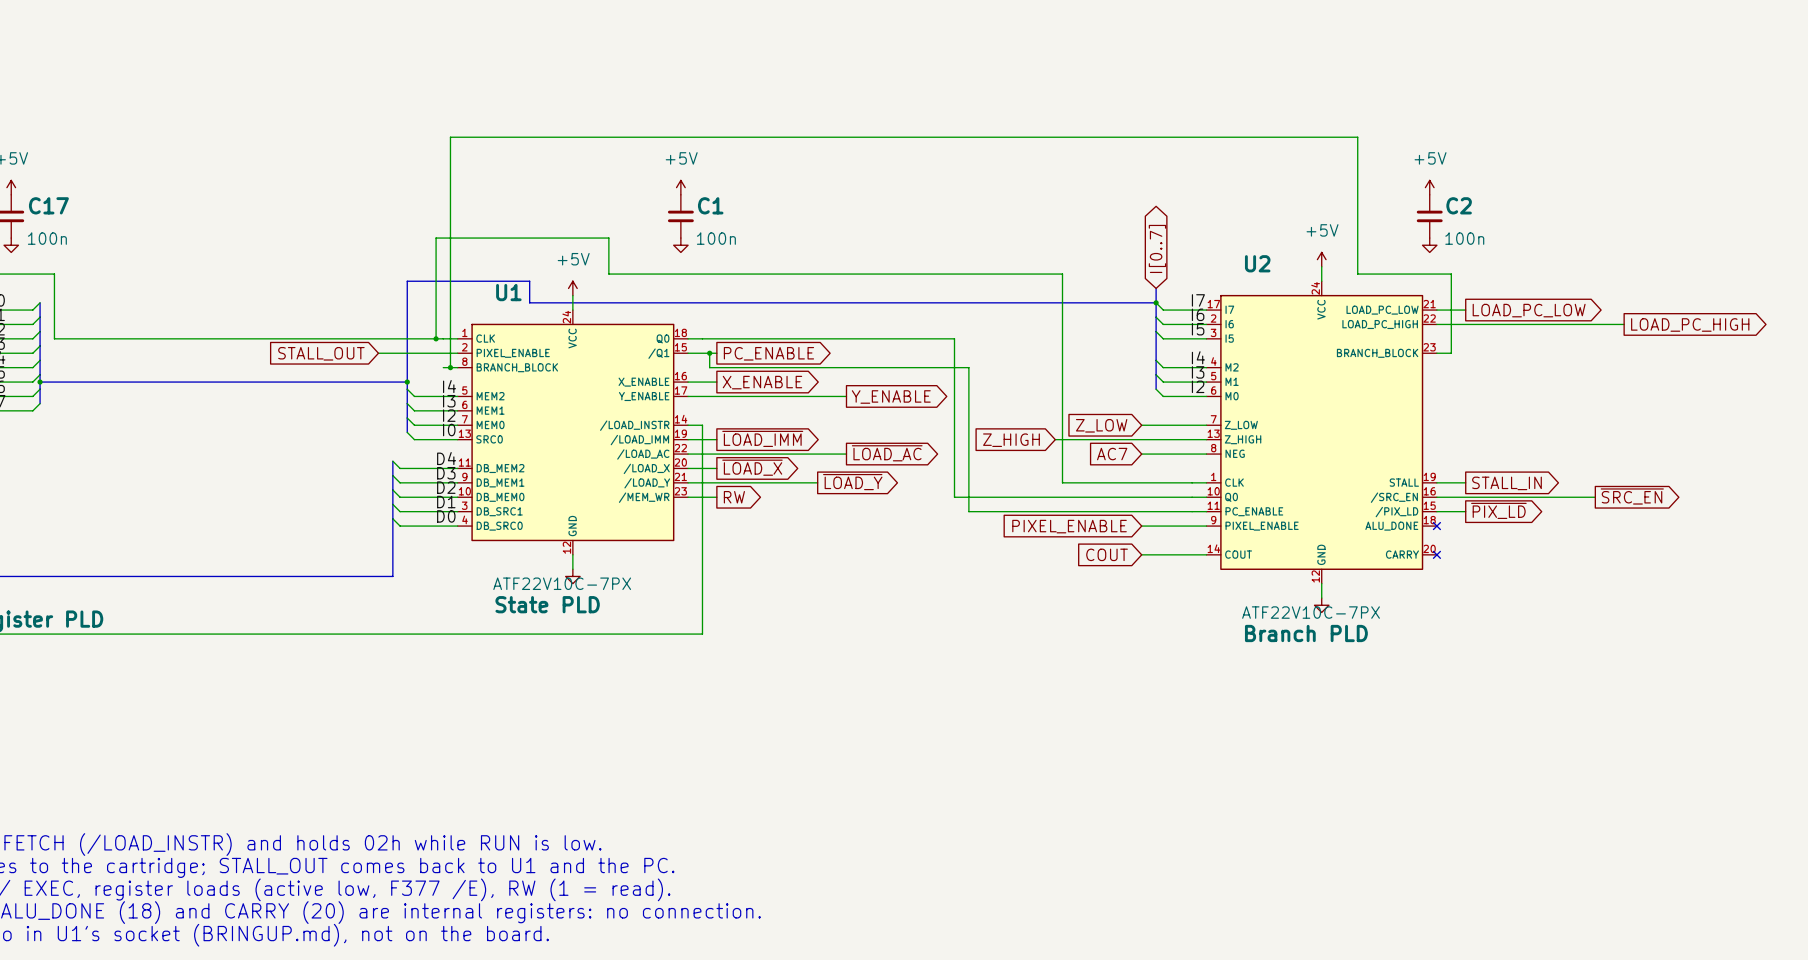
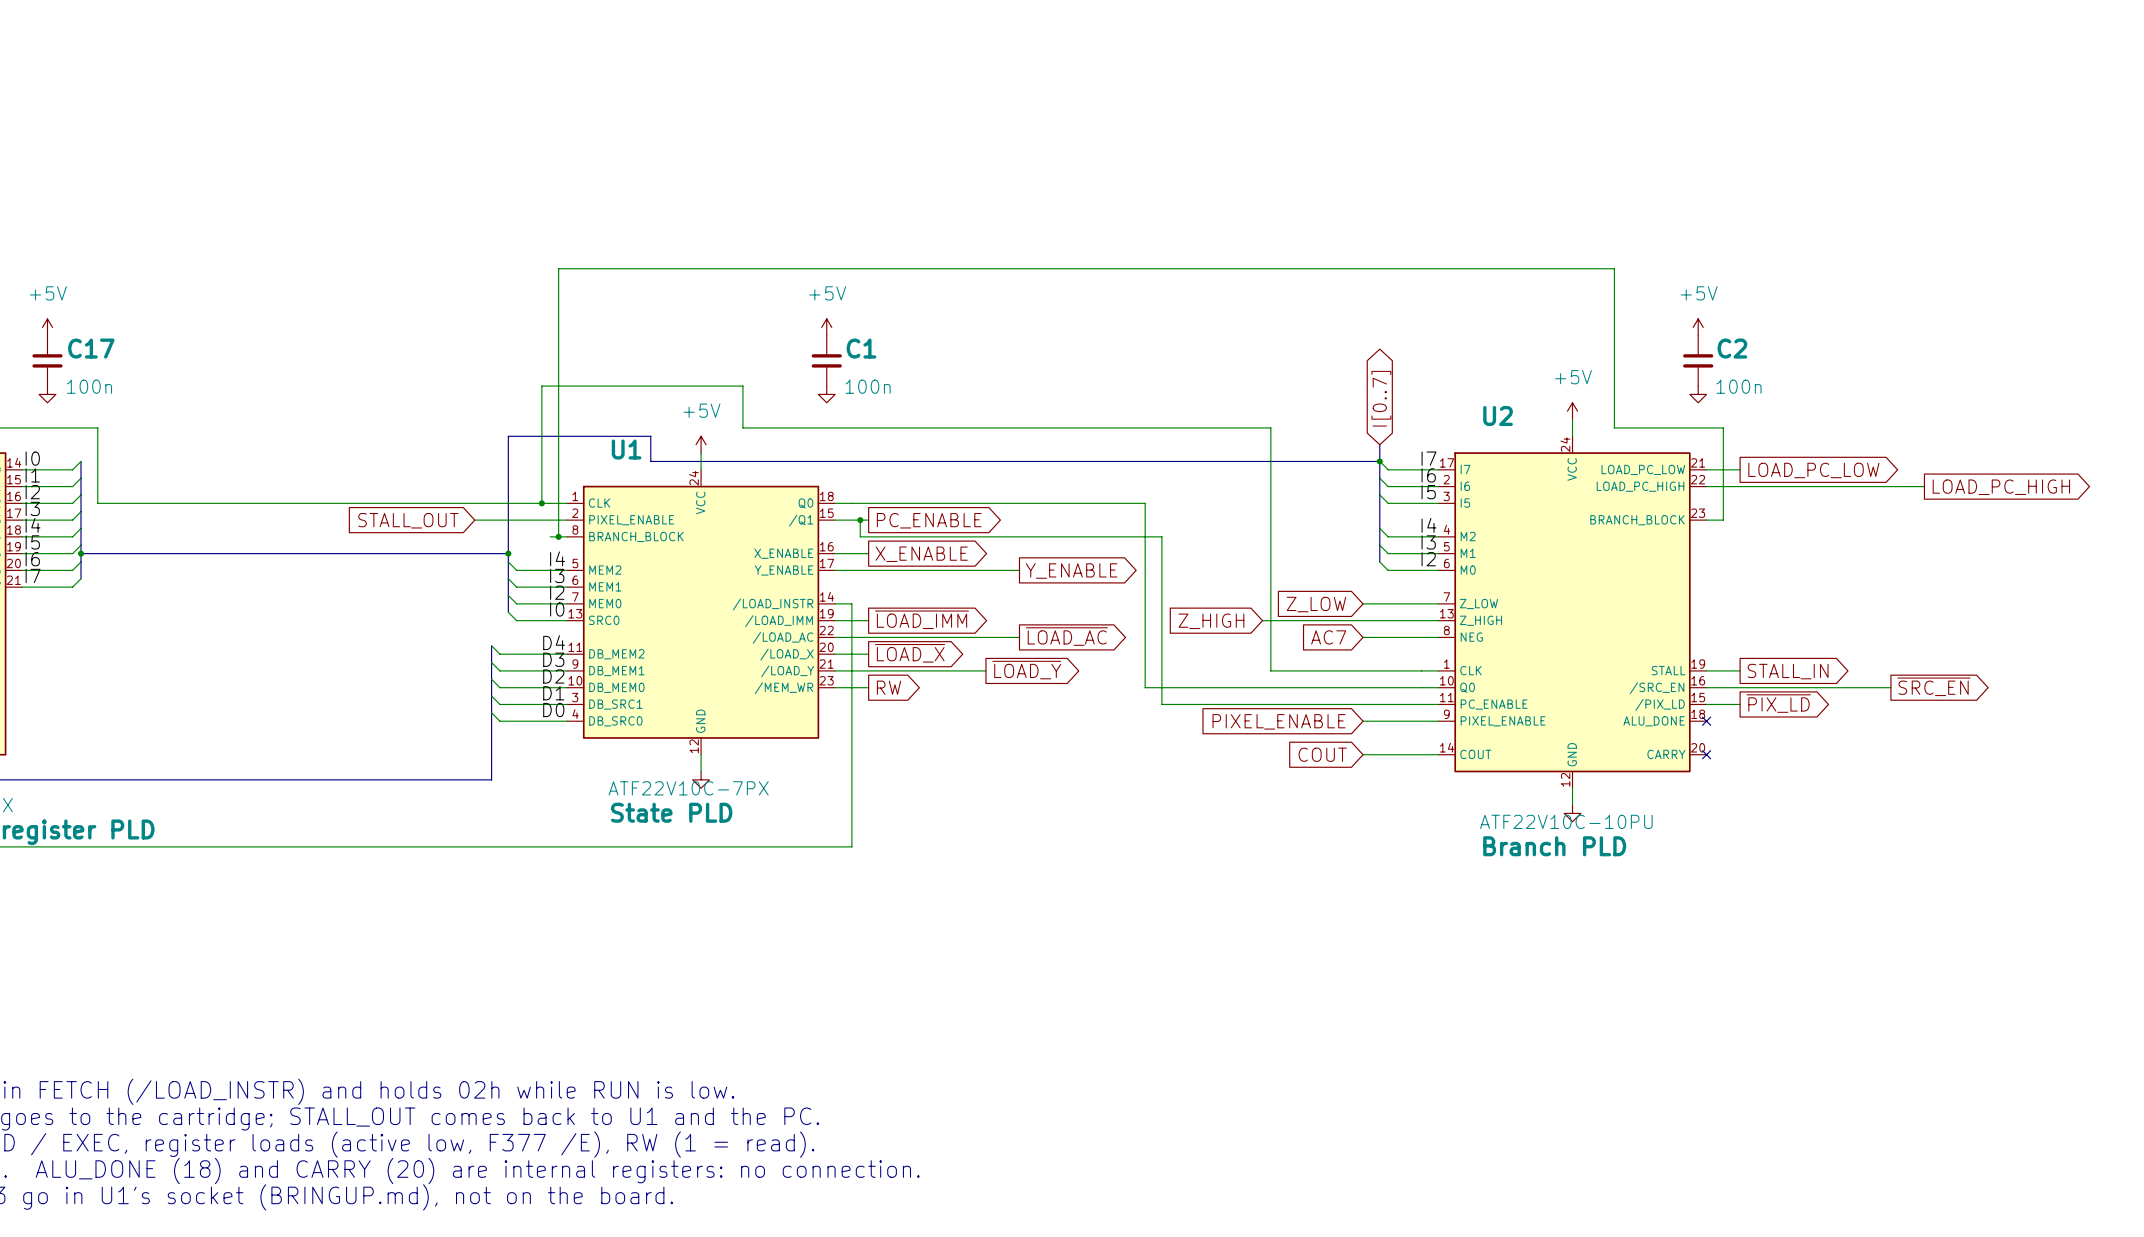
U2 value: ATF22V10C-7PX (1311, 612) -> ATF22V10C-10PU (1566, 821)

